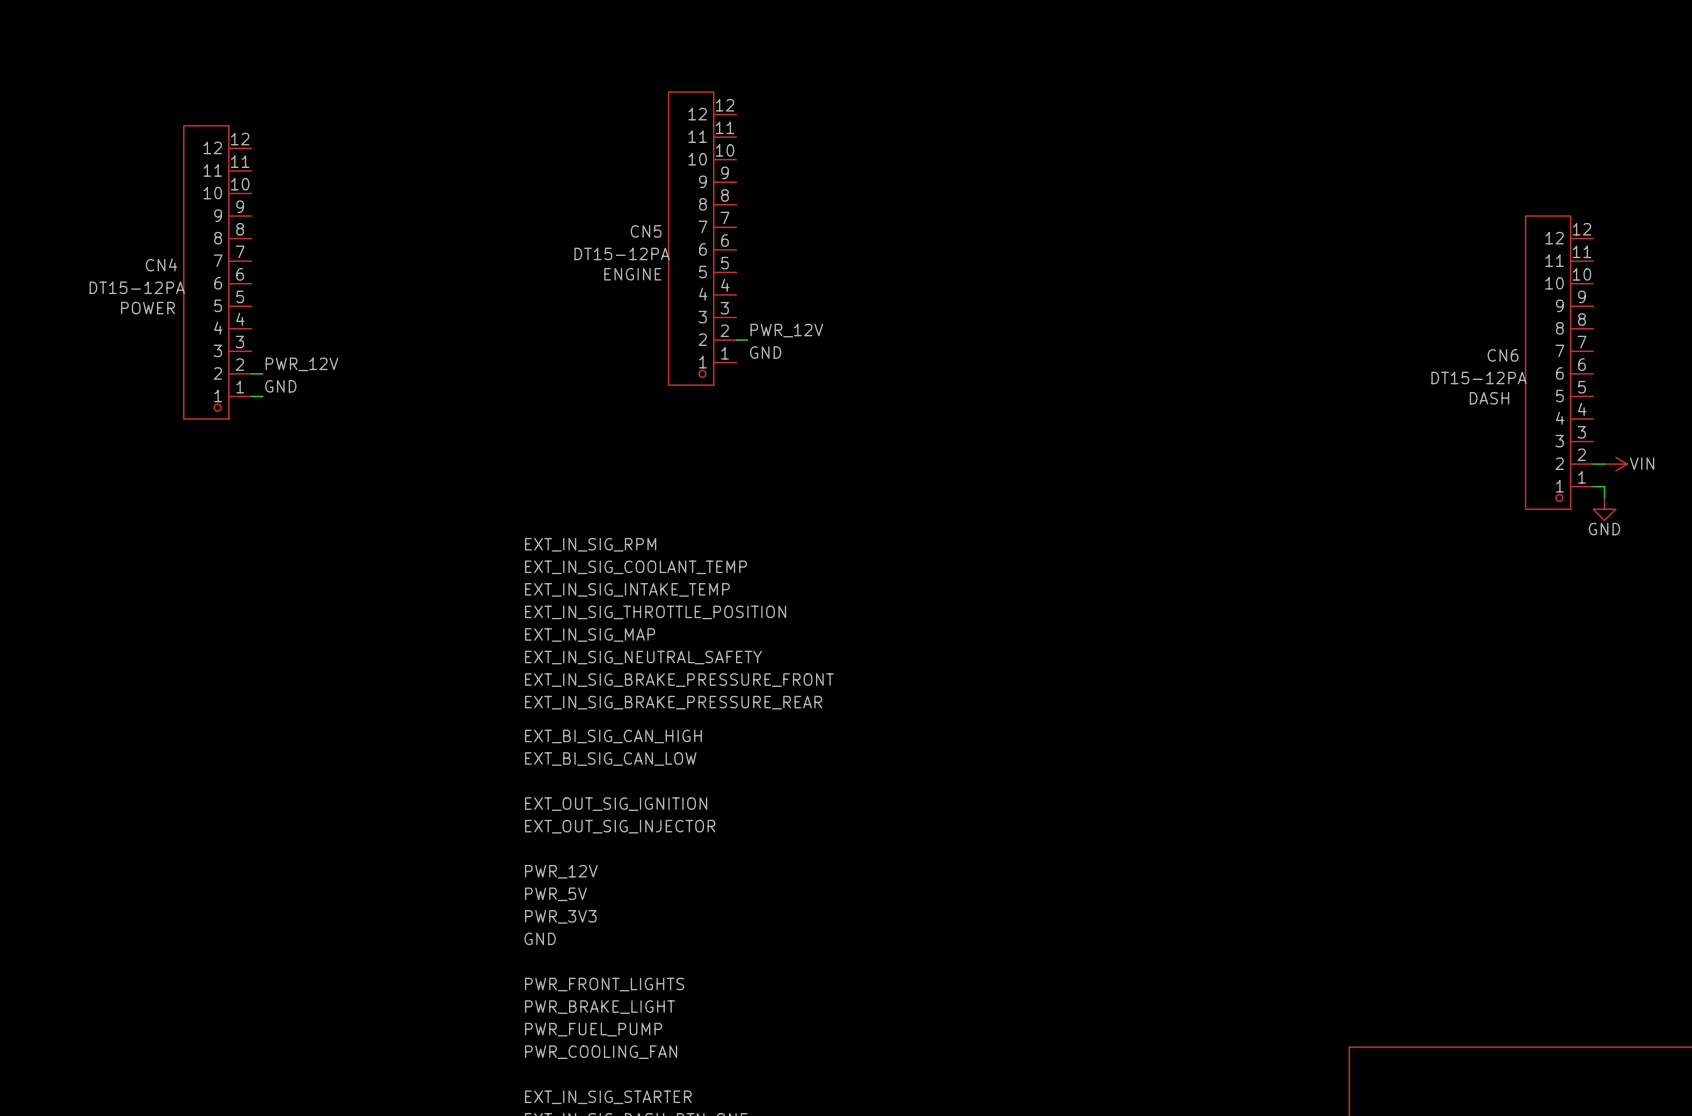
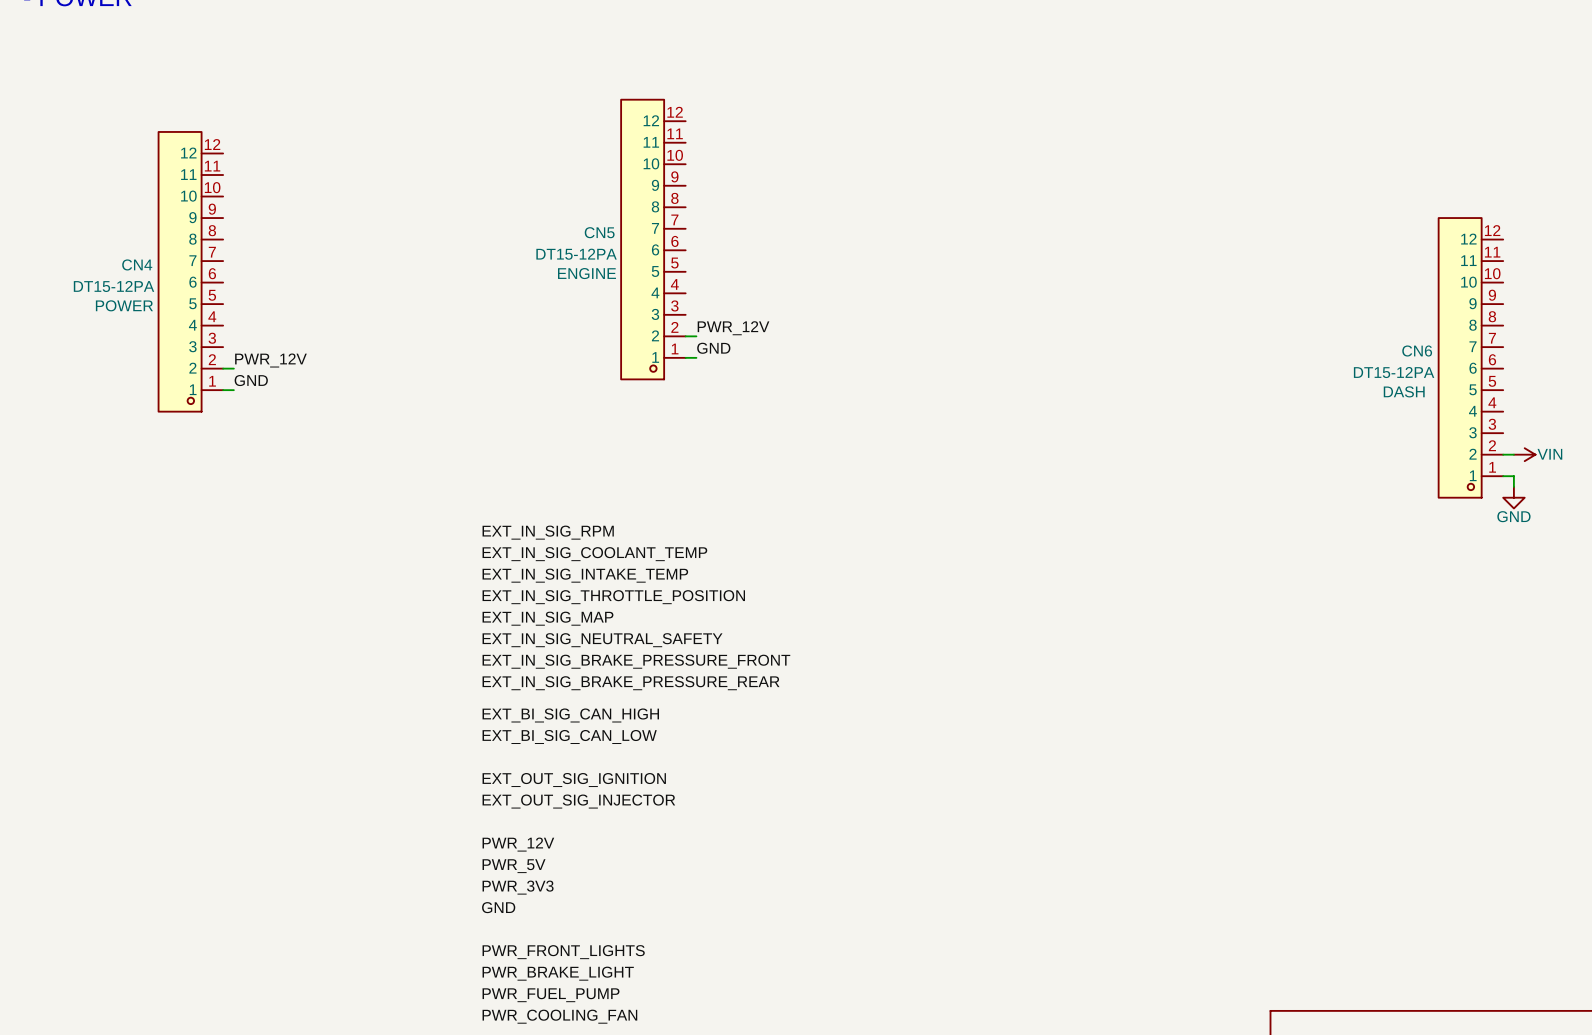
wire: none -> (685, 357) (696, 357)

